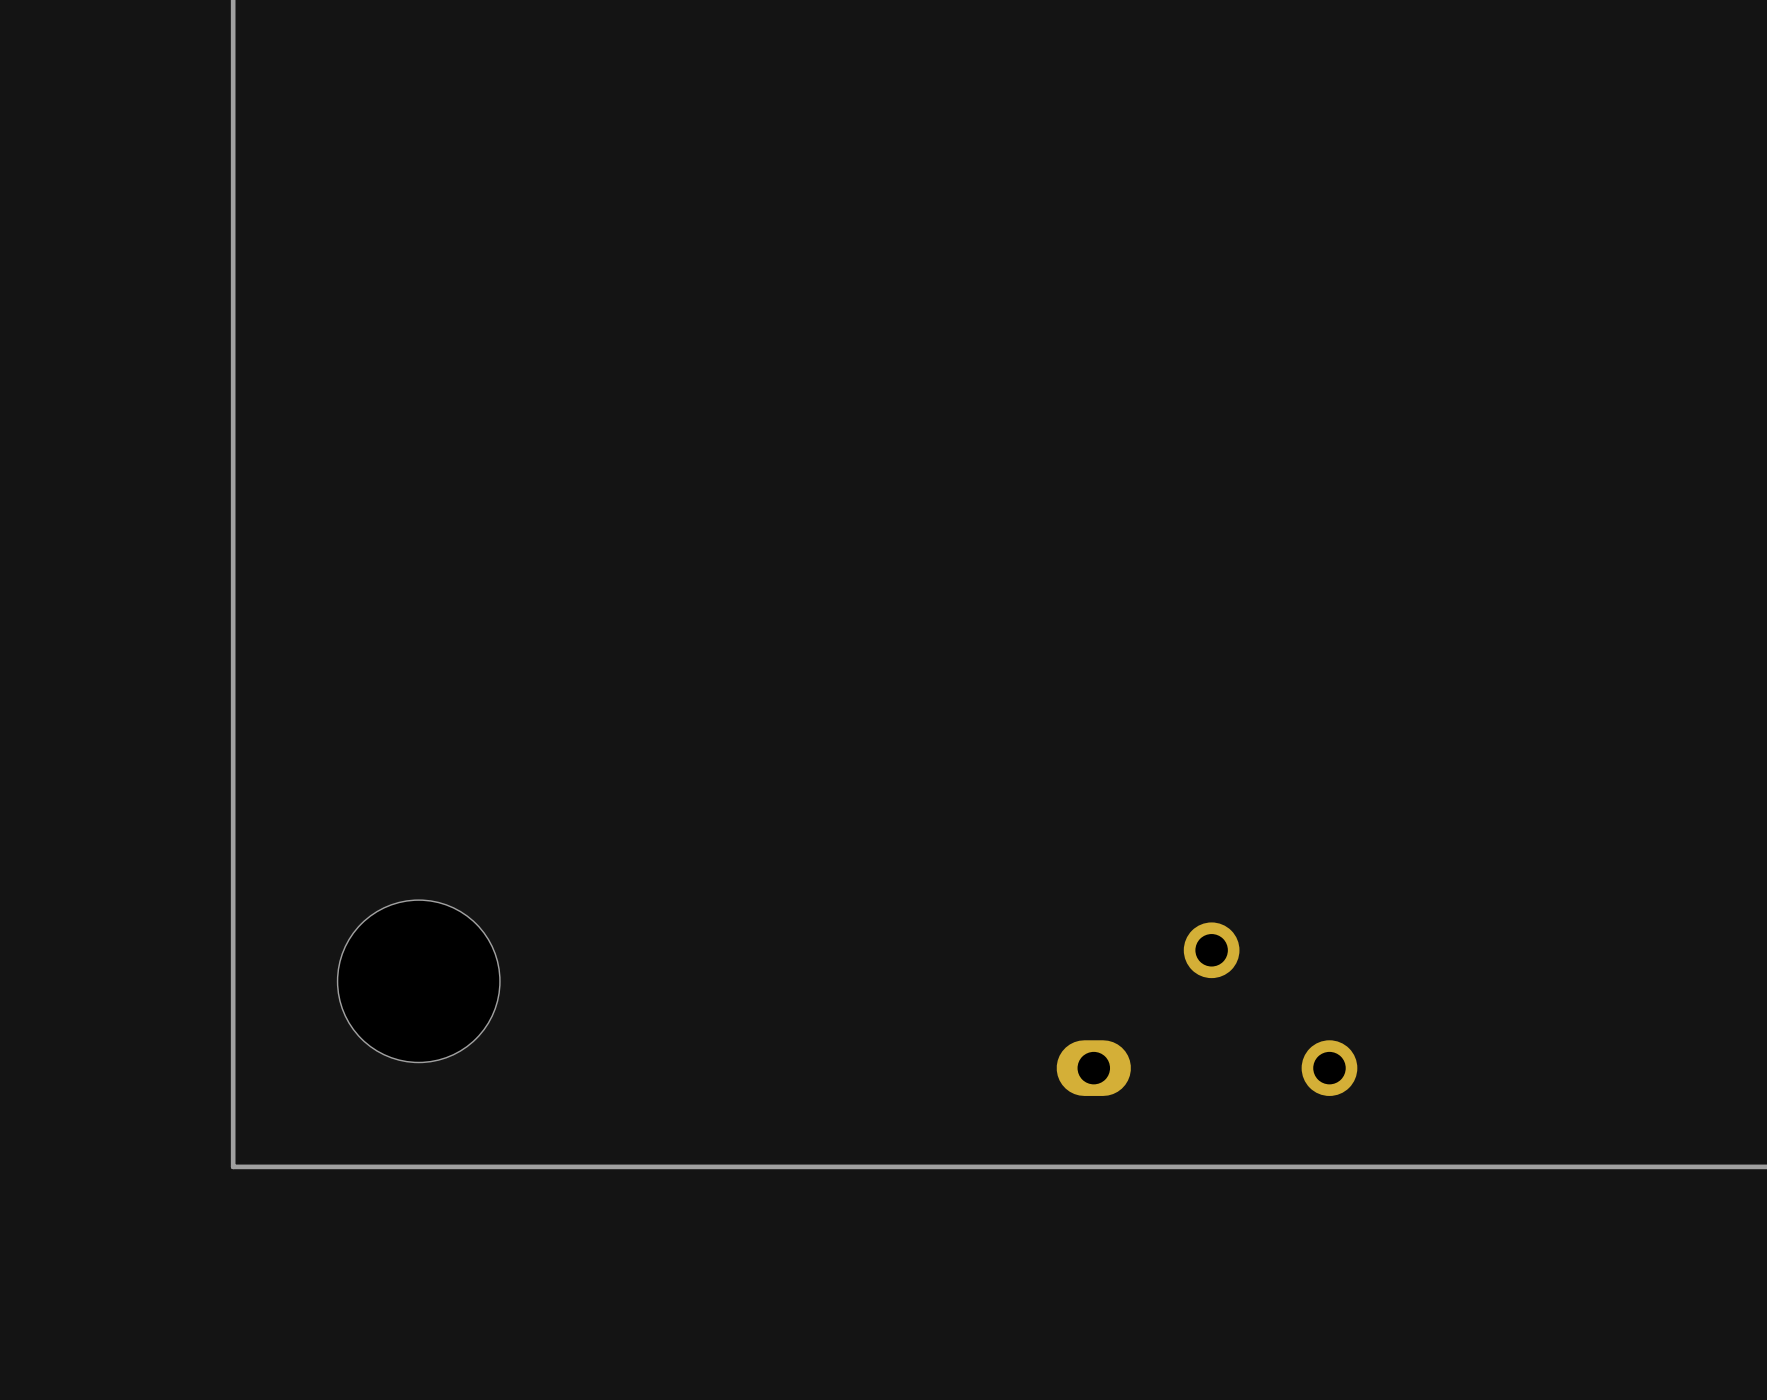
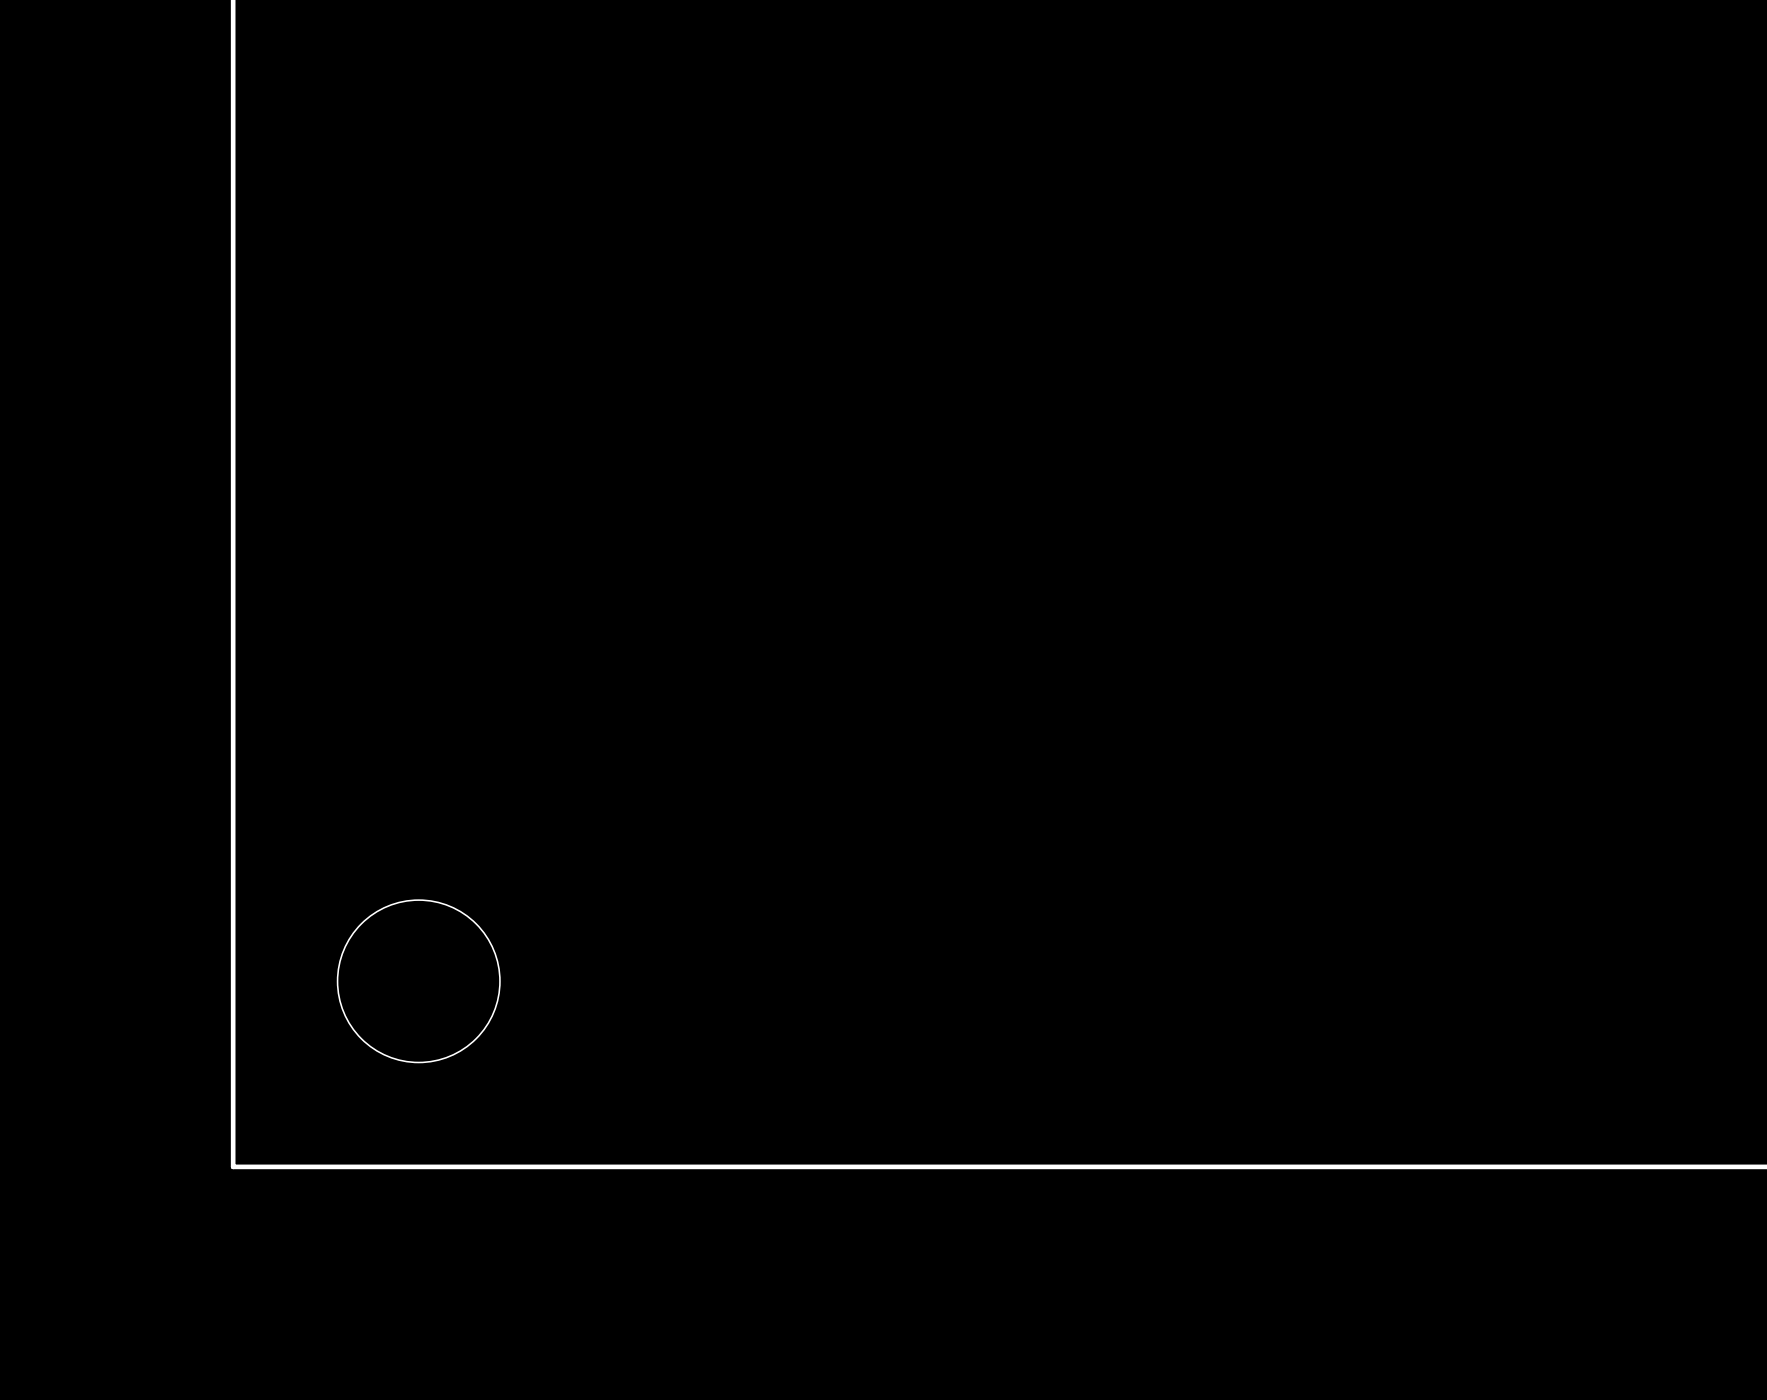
part: (1206, 1009) -> none

